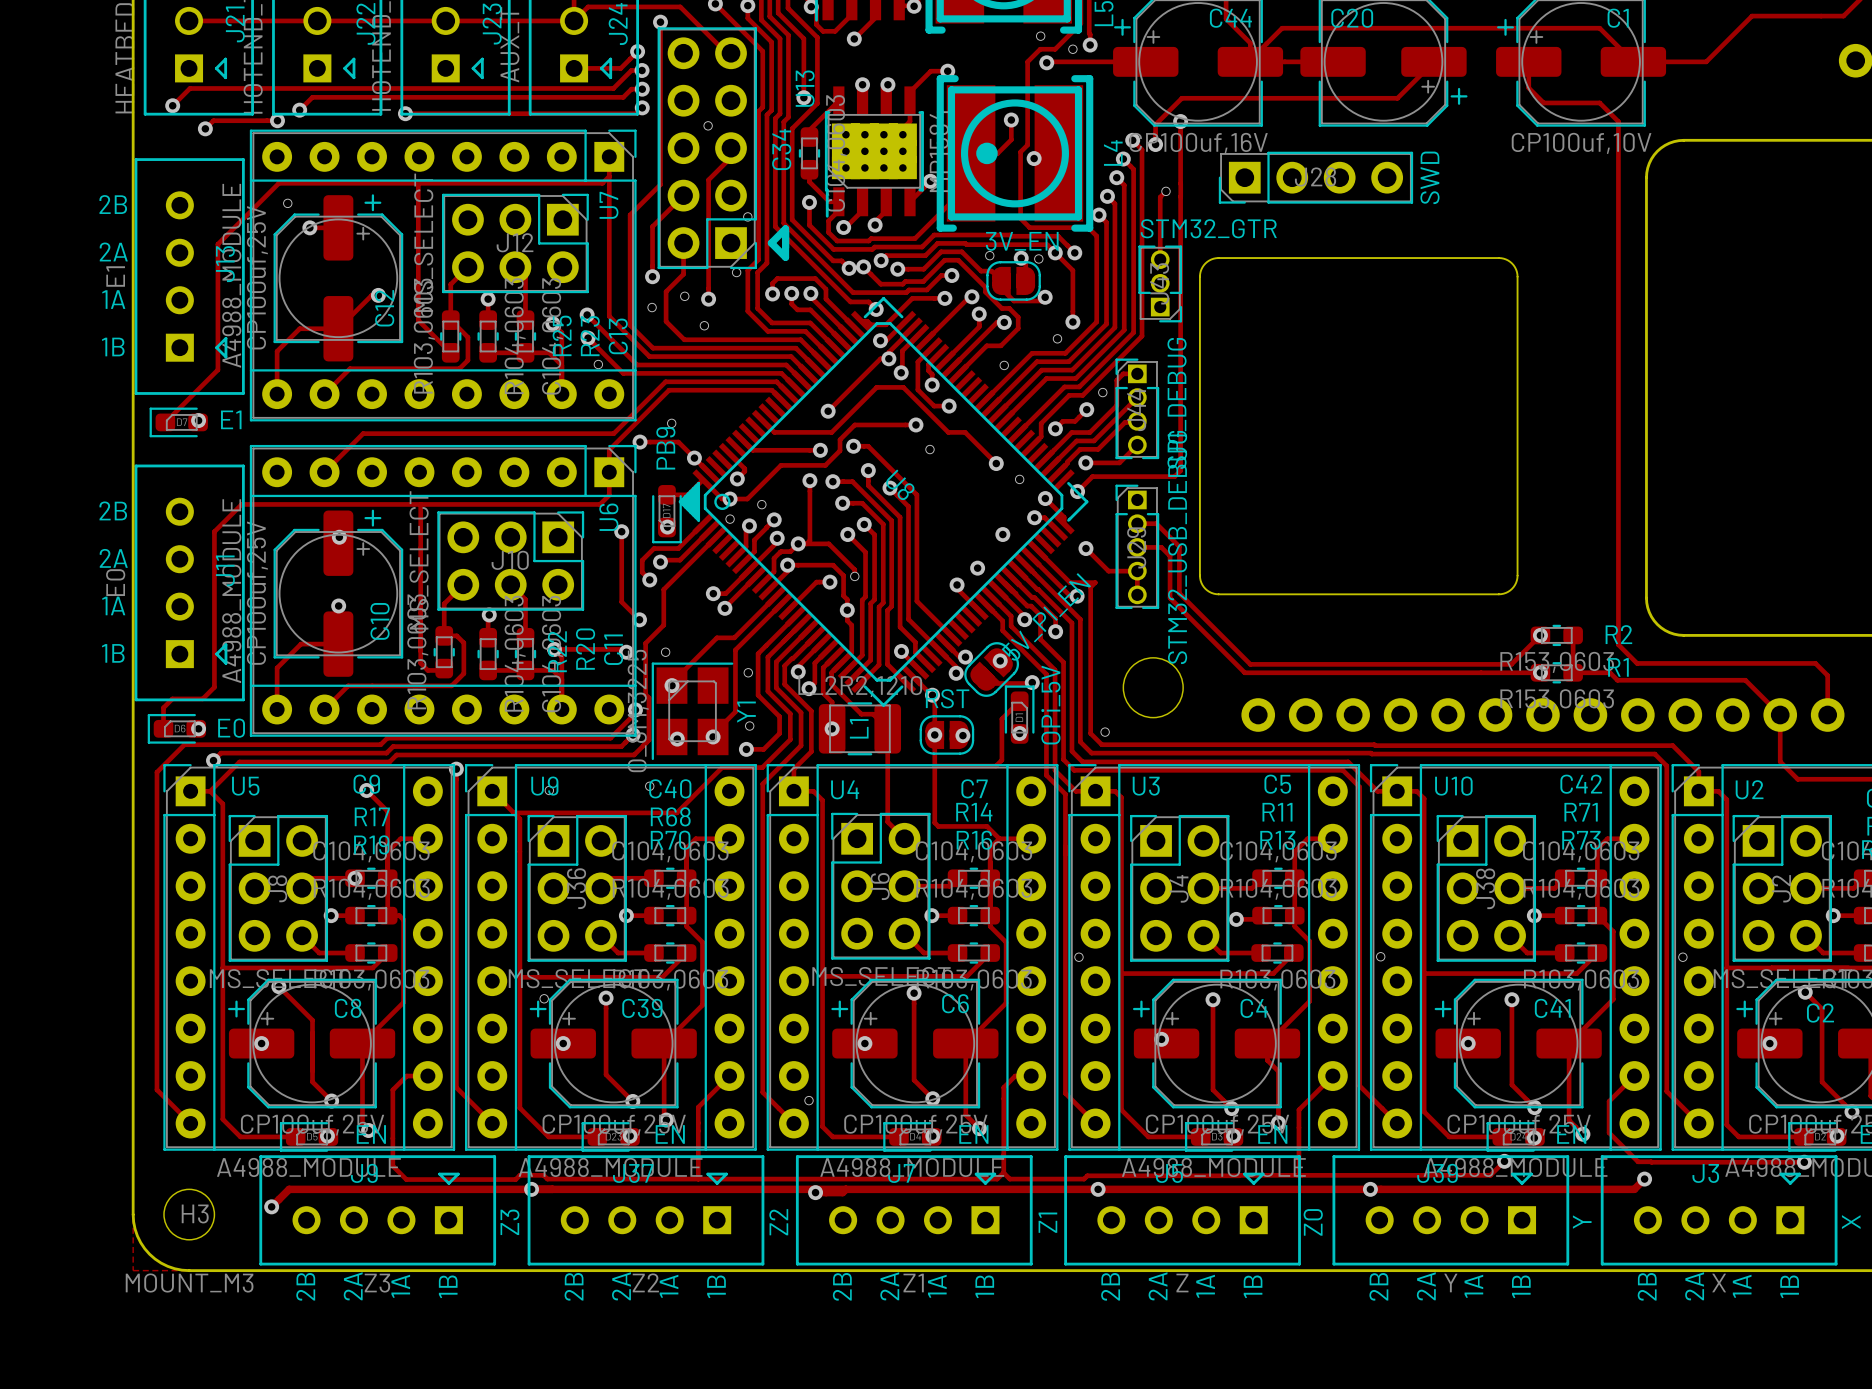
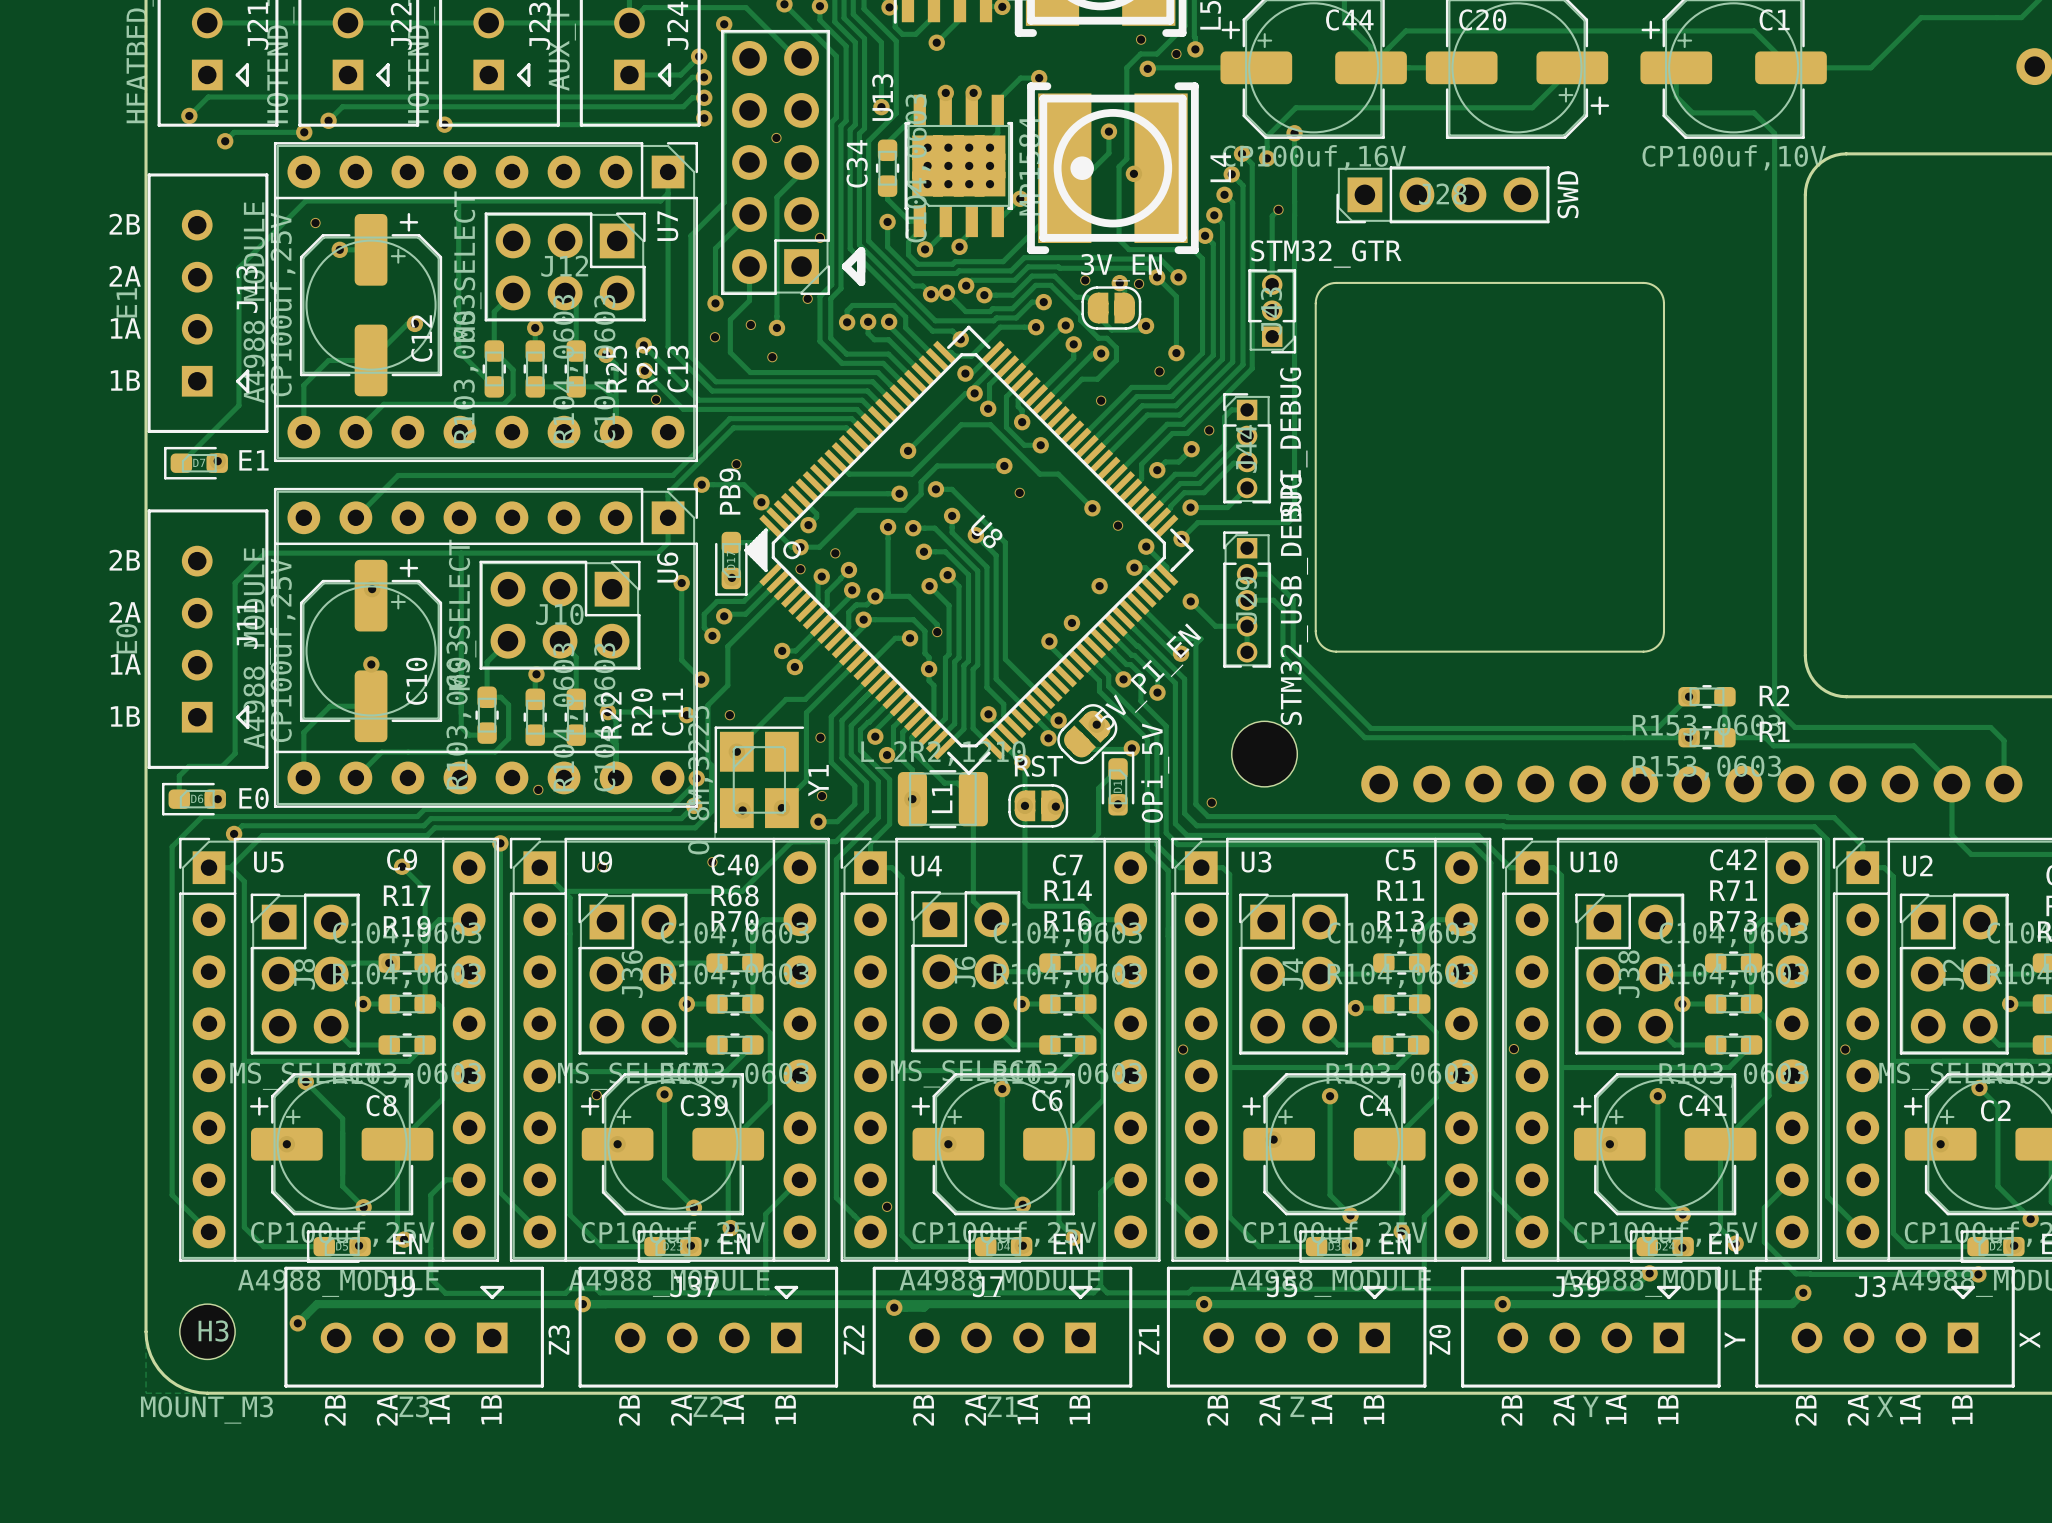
via: none -> (538, 789)

